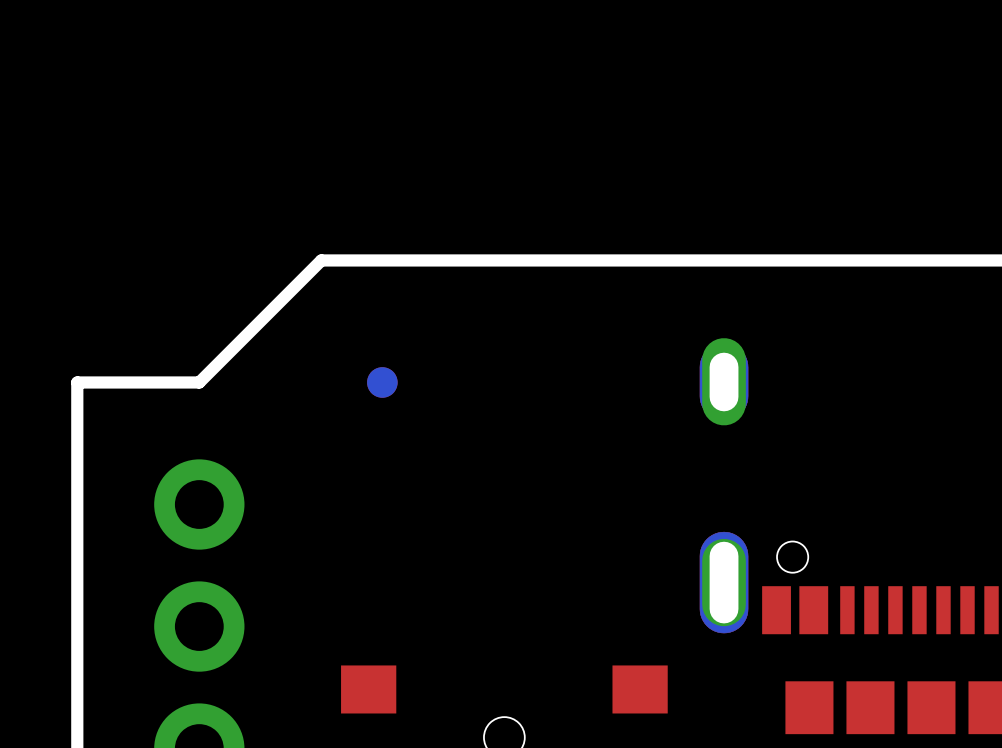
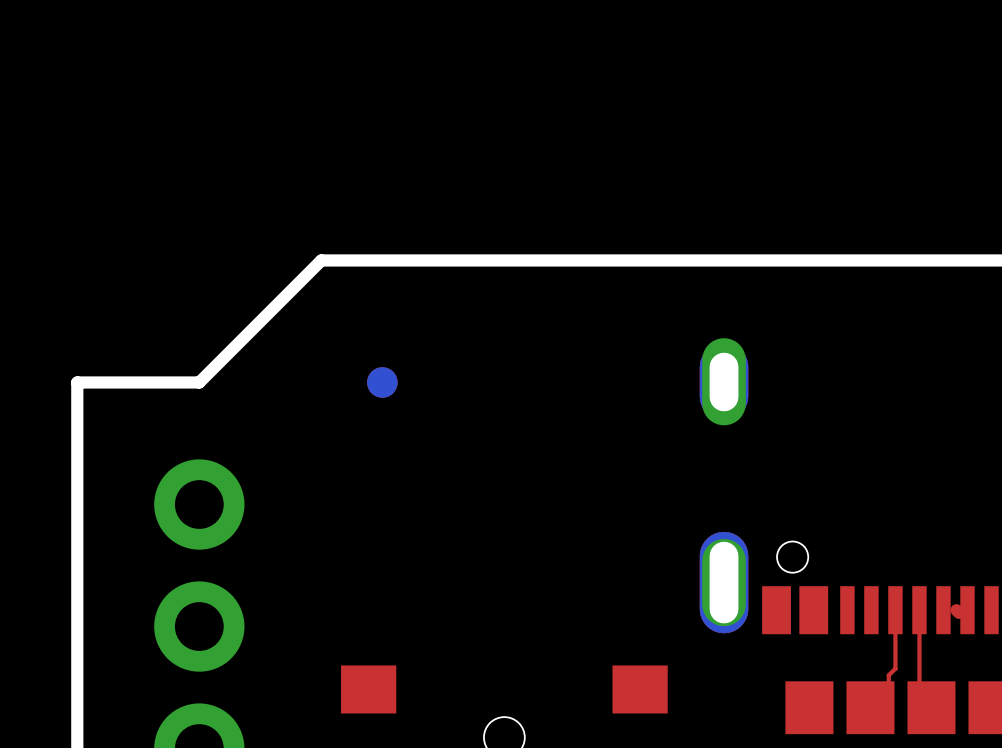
top track: none -> (895, 610) (895, 668) (888, 675) (888, 687)
top track: none -> (919, 610) (919, 695) (931, 707)
top track: none -> (956, 610) (959, 612)

